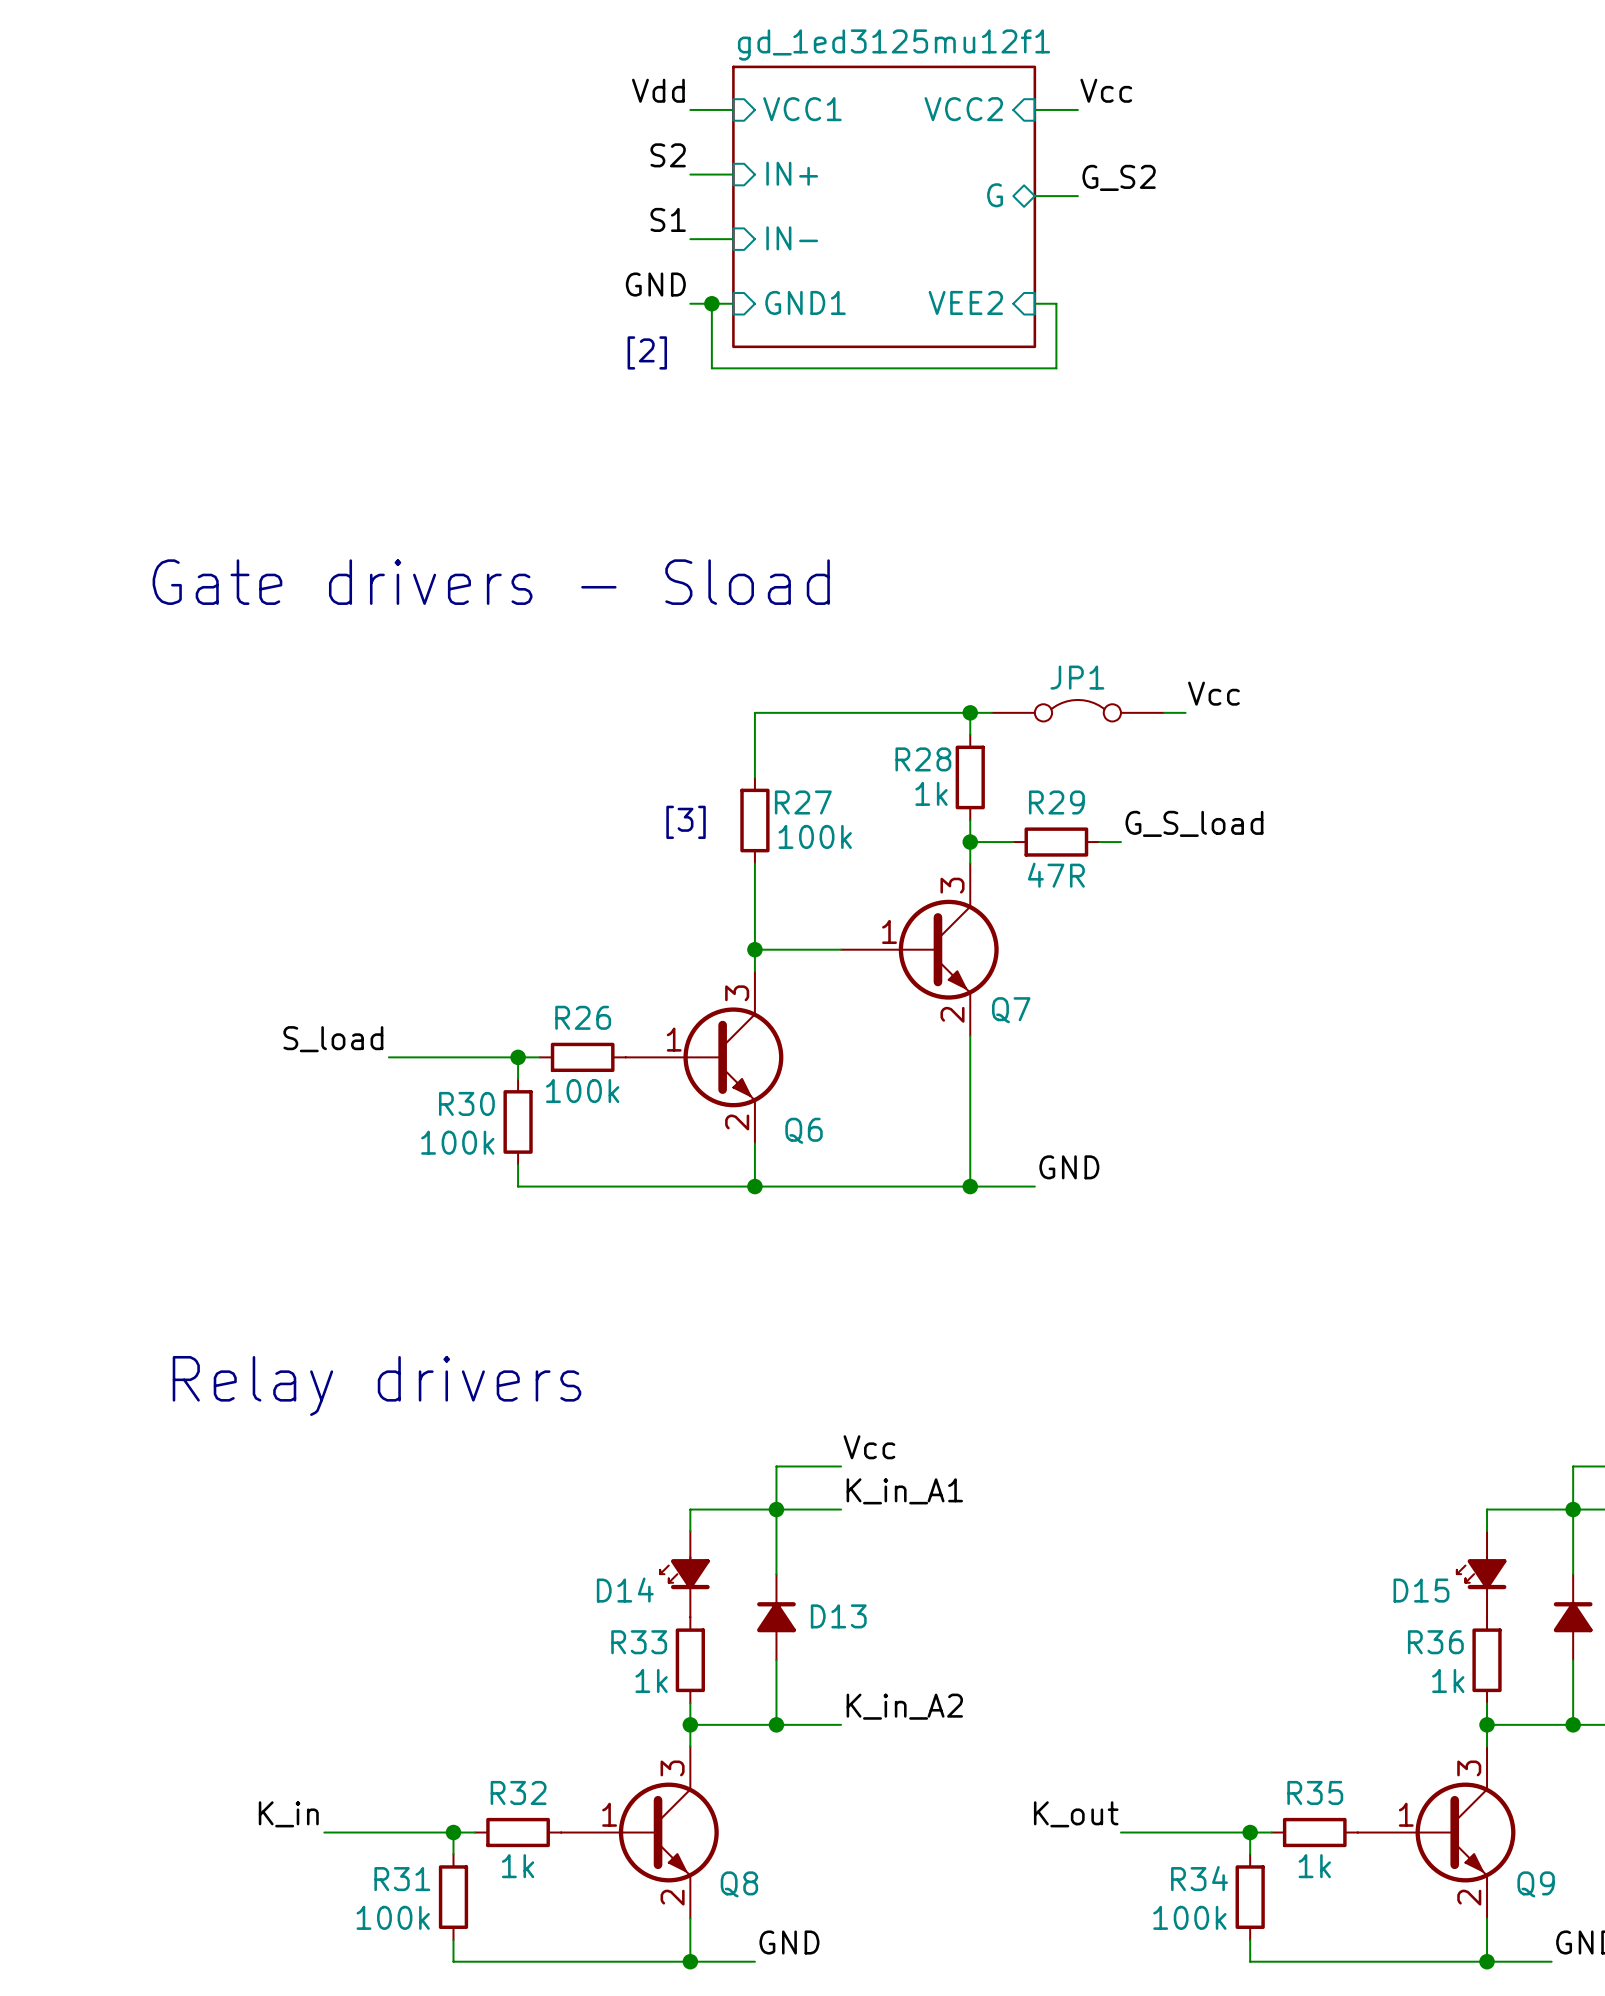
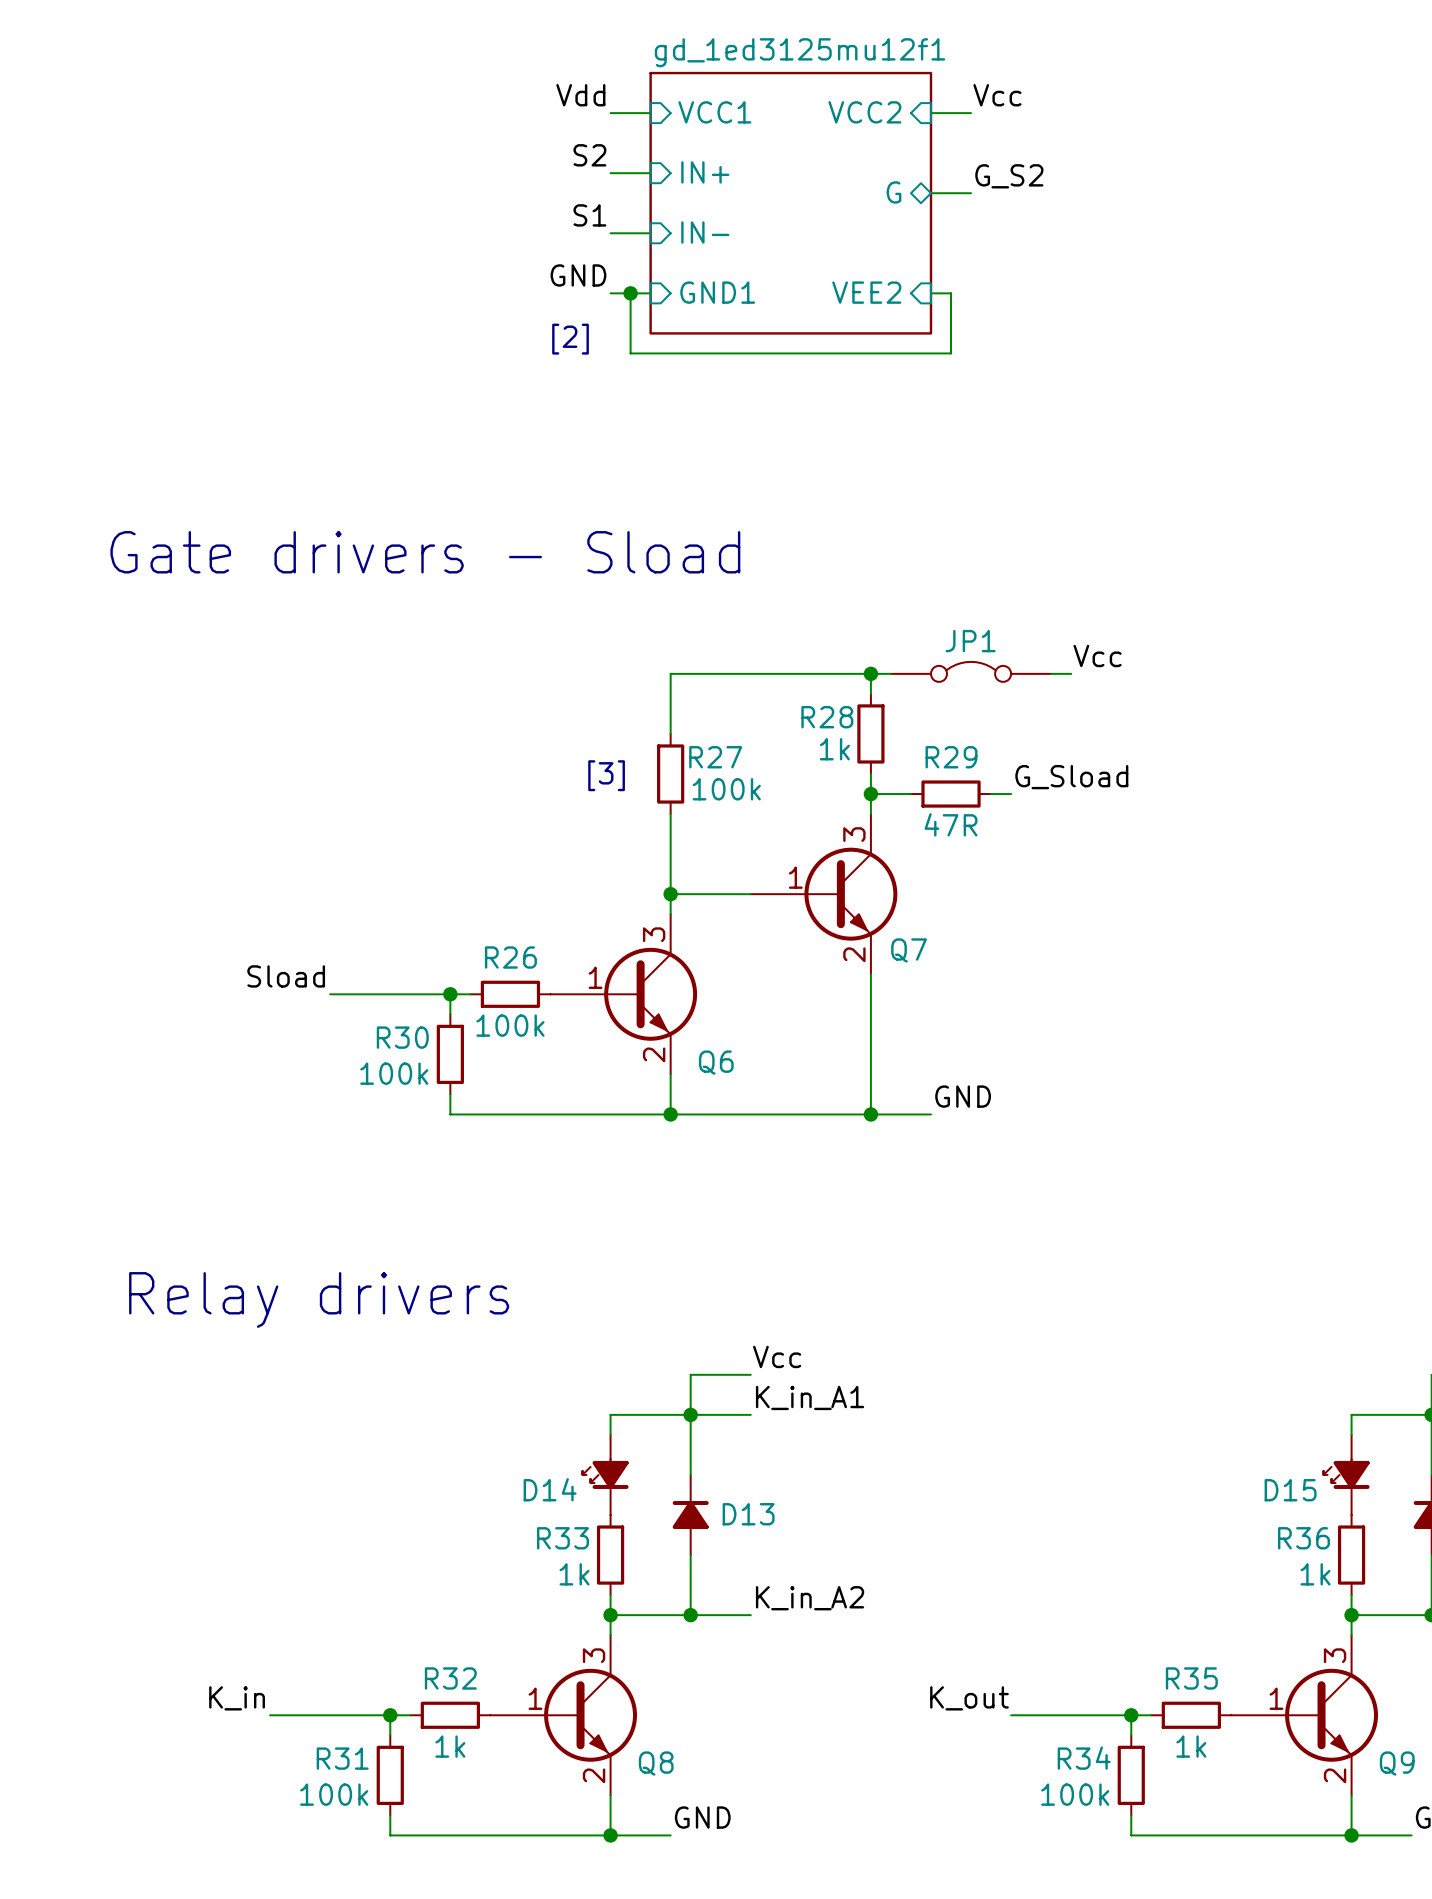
label: G_S_load (1194, 823) -> G_Sload (1071, 777)
label: S_load (333, 1039) -> Sload (286, 976)

